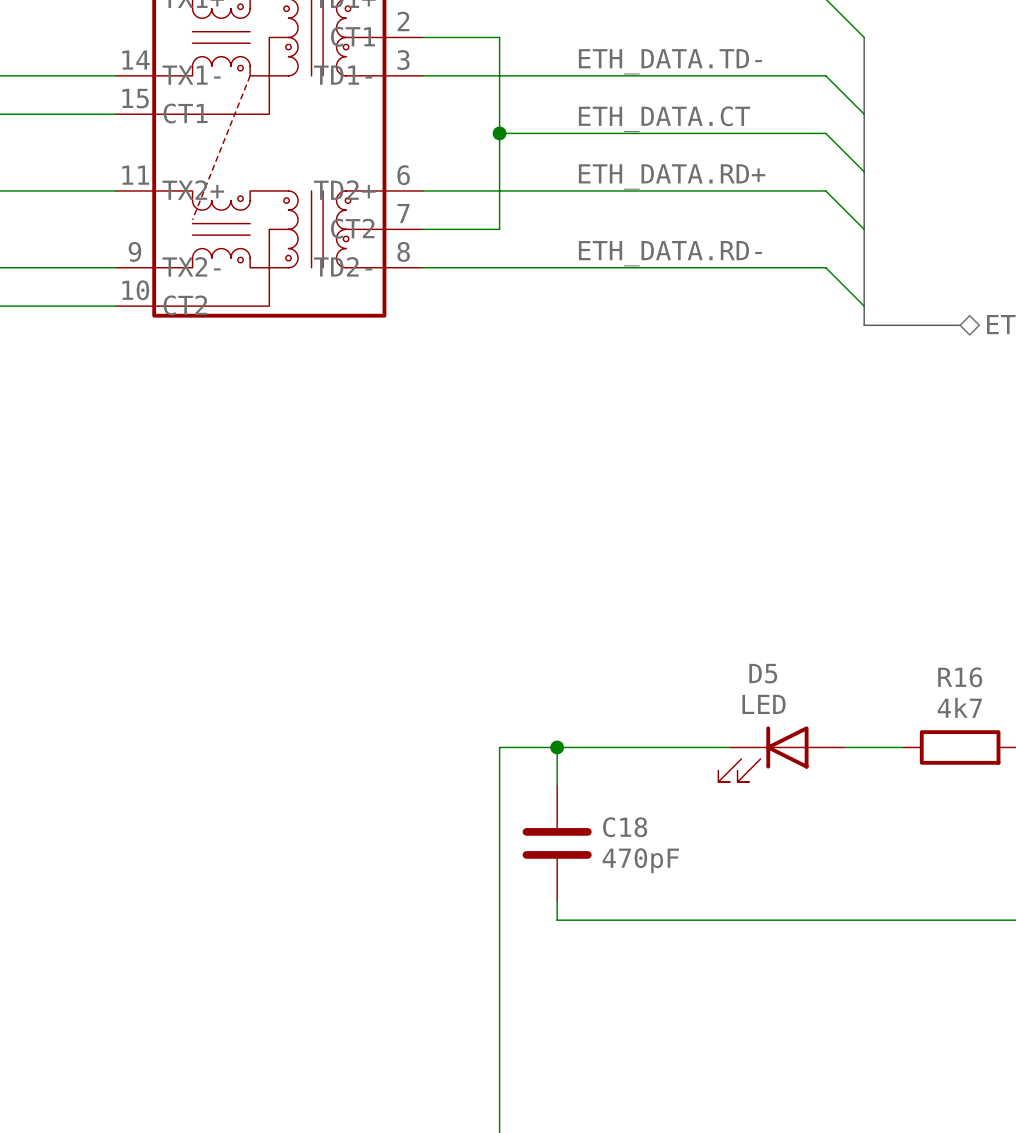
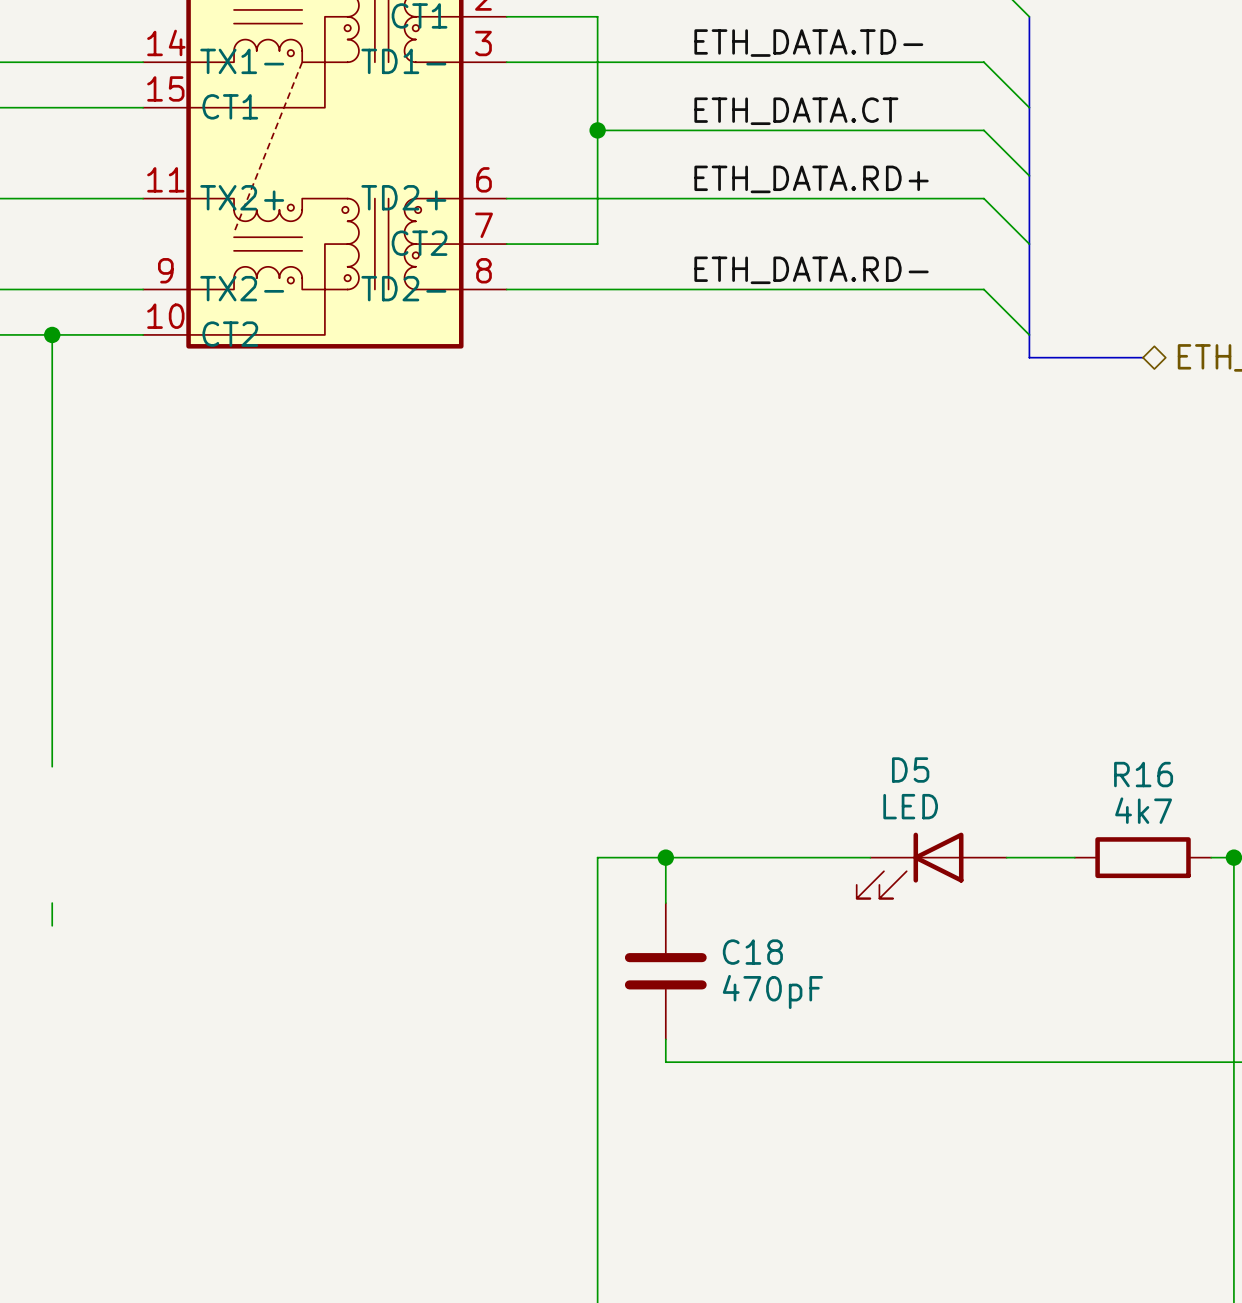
wire: none -> (52, 334) (52, 766)
junction: none -> (52, 334)
wire: none -> (52, 903) (52, 925)

